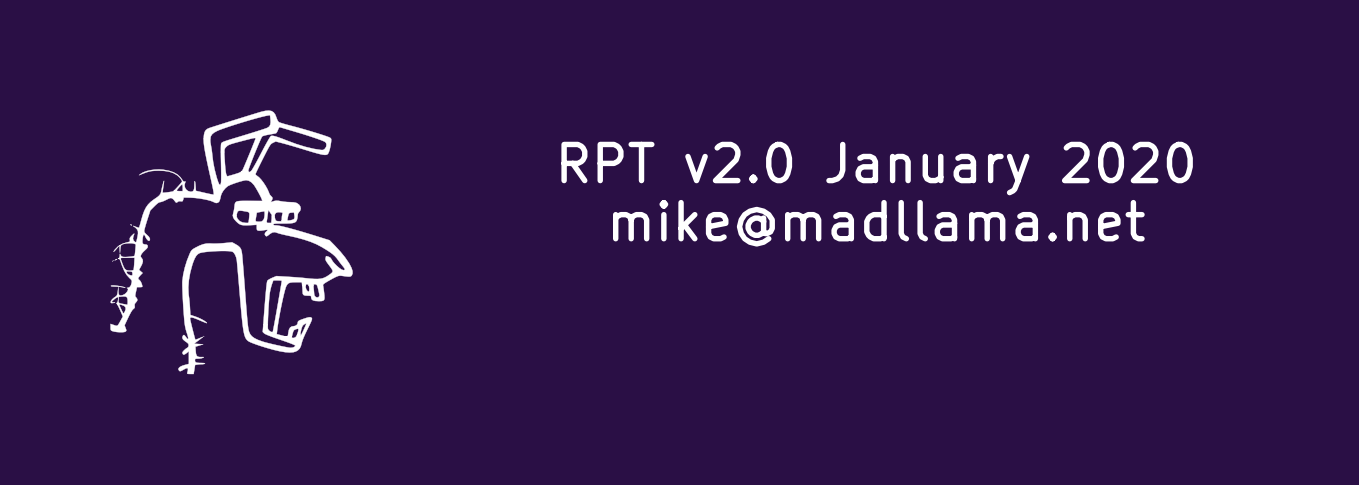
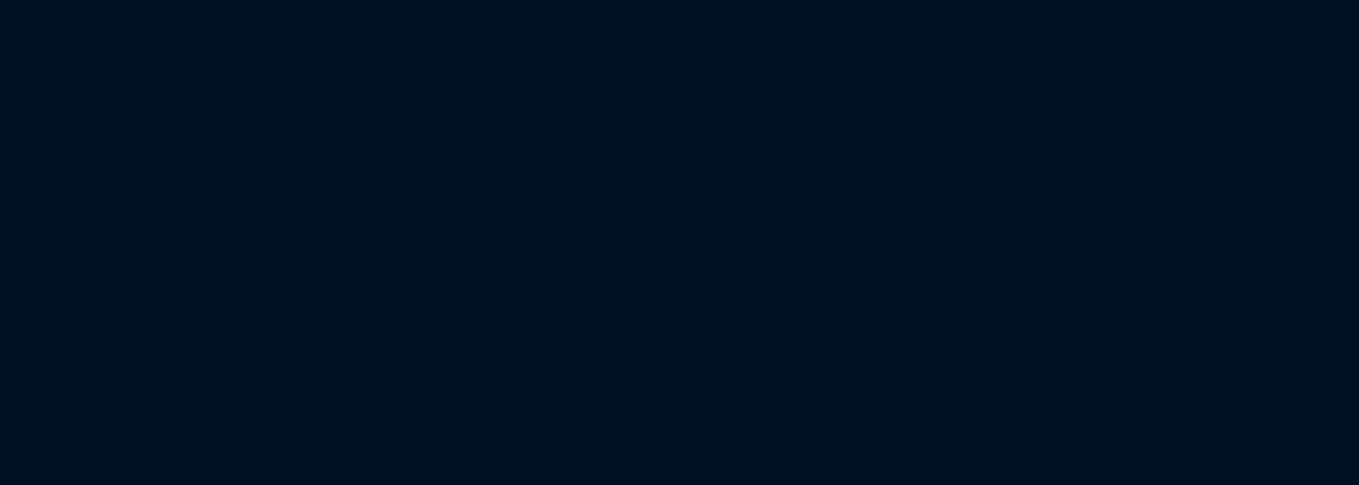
drawing: [110, 110, 353, 375] -> none
text: RPT v2.0 January 2020 (877, 168) -> none
text: mike@madllama.net (878, 223) -> none

